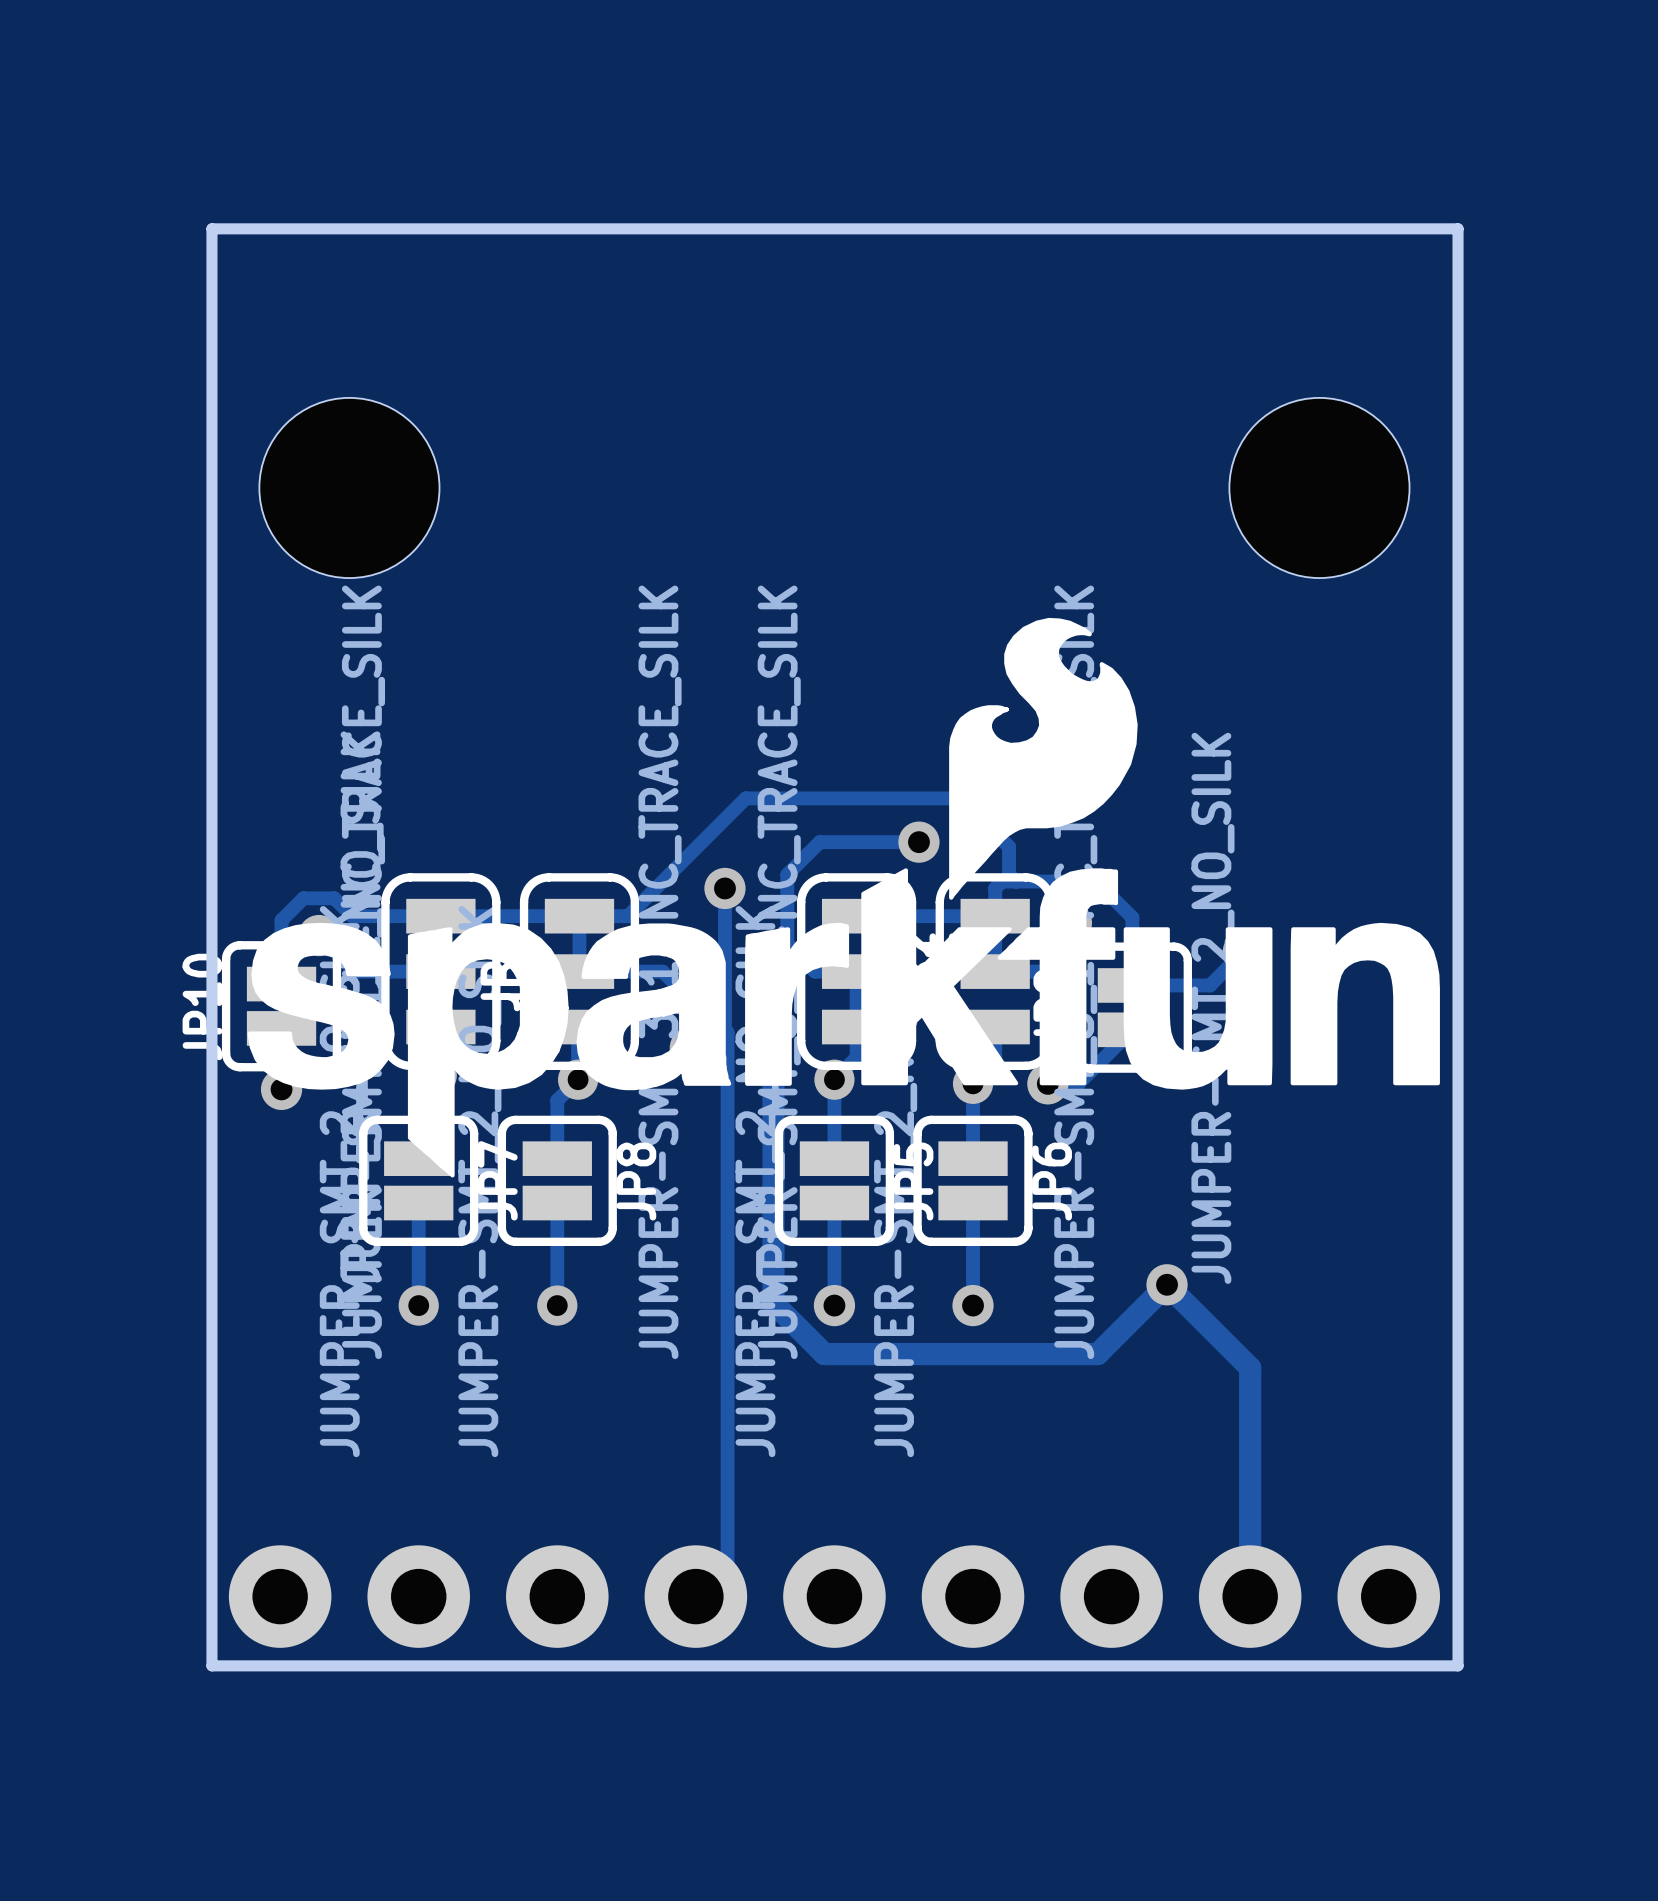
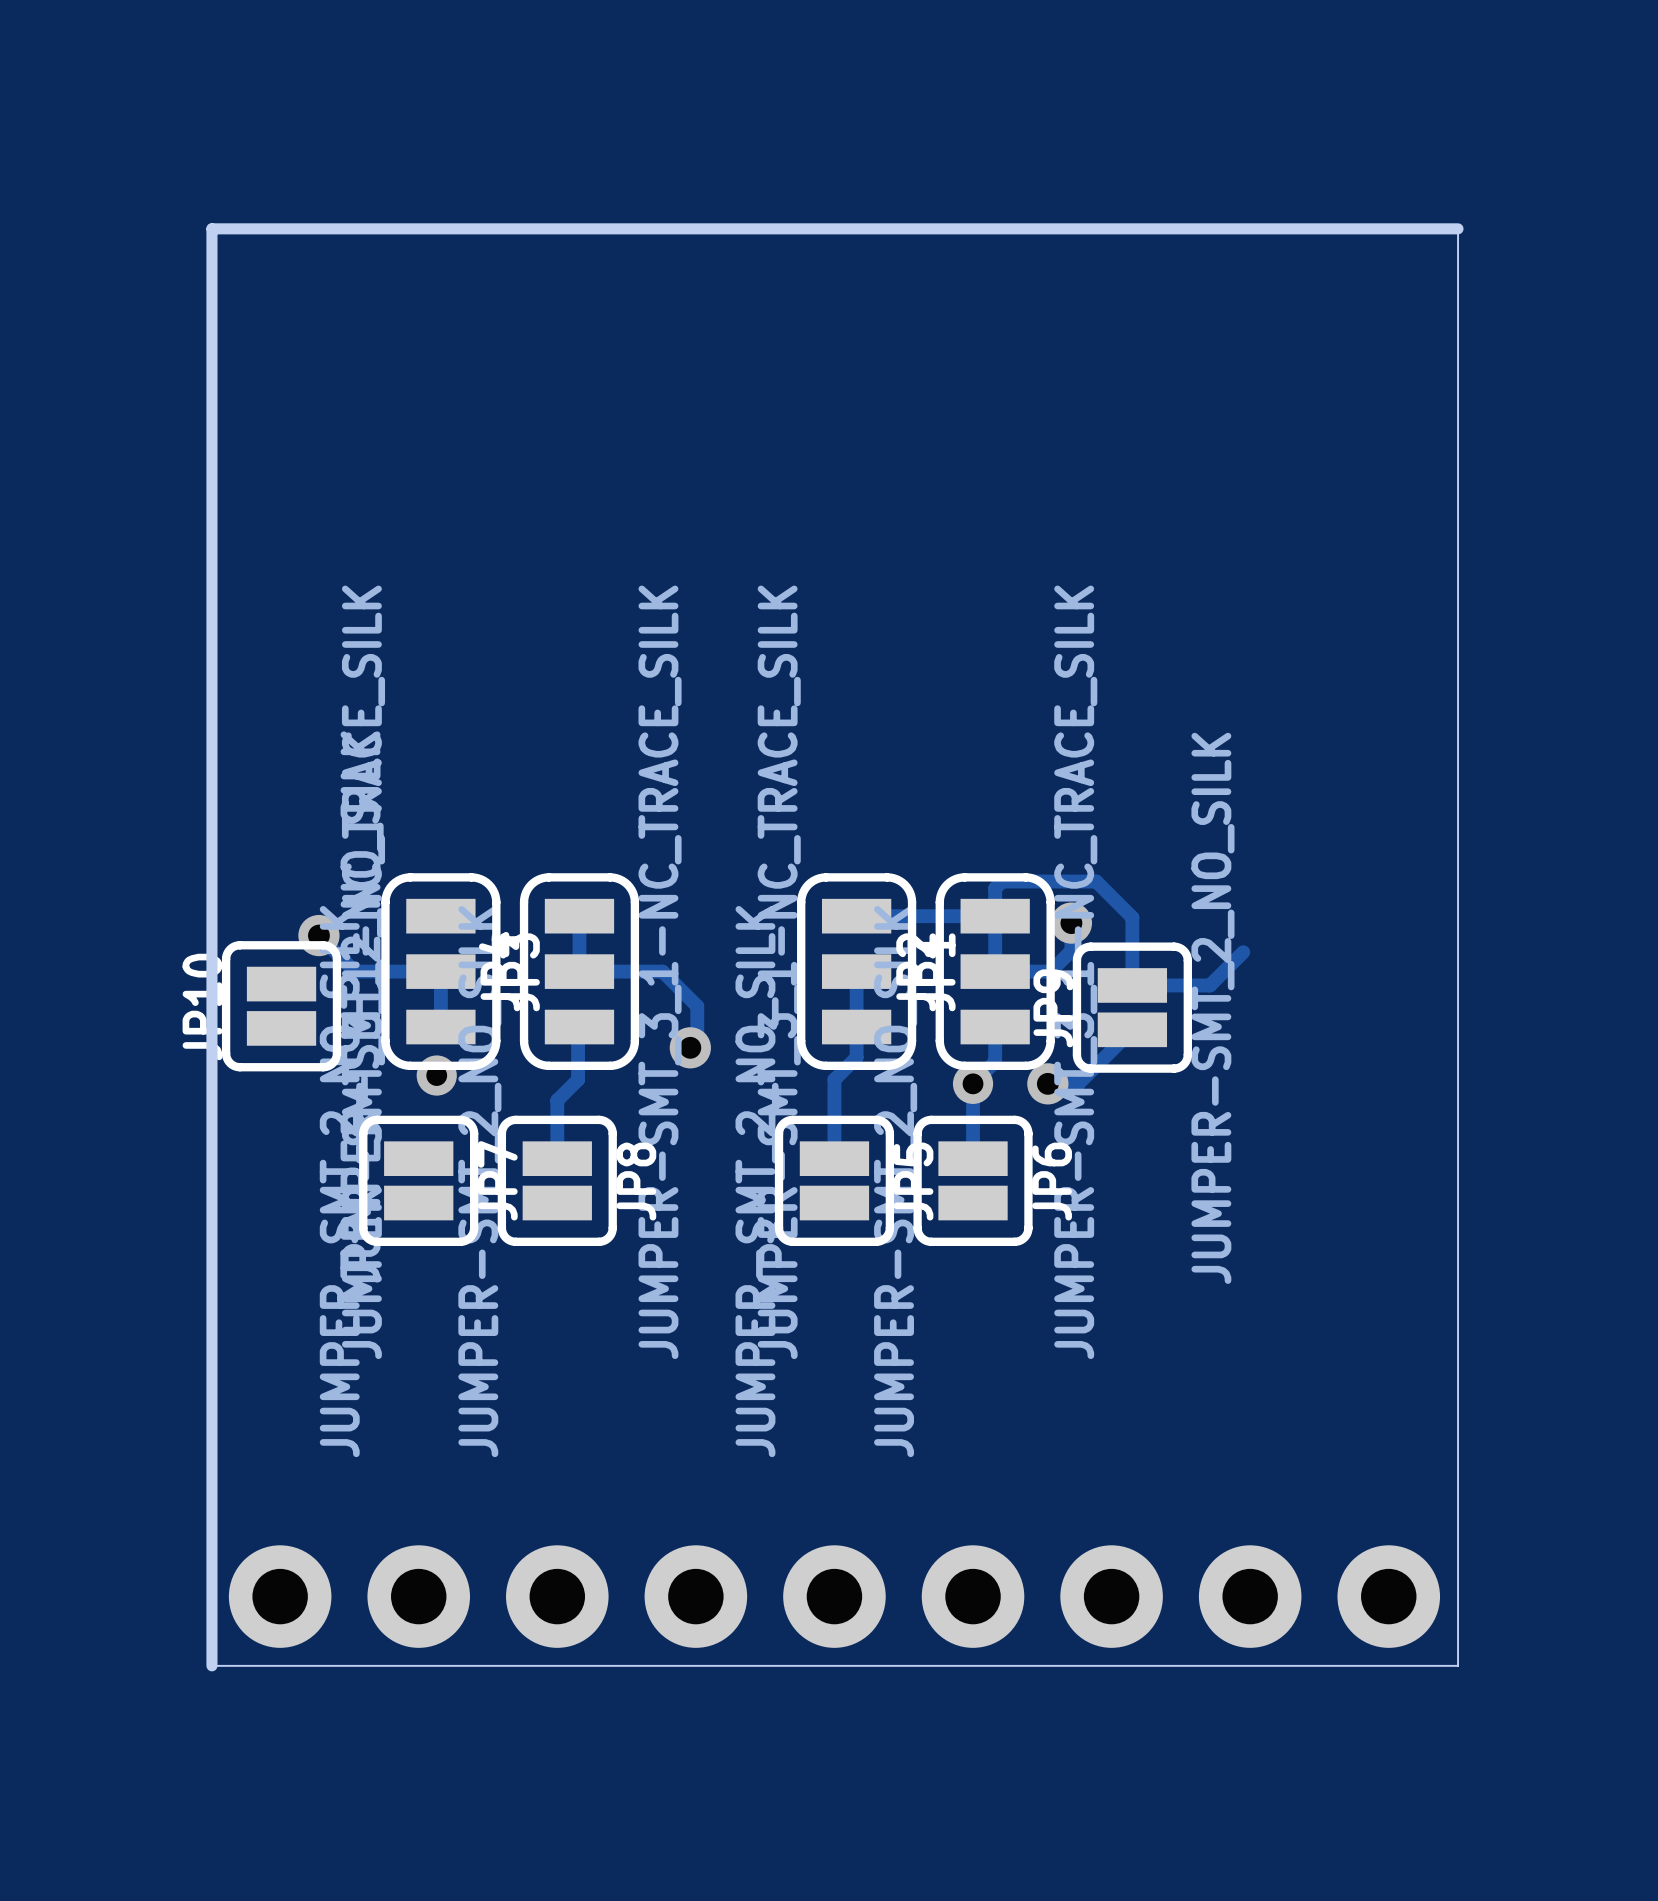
board edge width: thick (1458, 228) (1458, 1665) (211, 1665) -> thin (1458, 228) (1458, 1665) (211, 1665)
part: (349, 487) -> none
part: (1319, 487) -> none
drawing: [247, 617, 1440, 1178] -> none
track: (918, 842) (819, 842) (787, 874) (787, 943) (815, 971) (856, 971) -> none
via: (918, 842) -> none
track: (1015, 881) (1009, 874) (1009, 846) (960, 798) (745, 798) (627, 916) (352, 916) (334, 898) (303, 898) (281, 920) (281, 984) -> none
track: (724, 888) (724, 1029) (727, 1032) (727, 1564) (695, 1596) -> none
via: (724, 888) -> none
track: (773, 1027) (773, 1303) (824, 1354) (1097, 1354) (1167, 1284) (1250, 1367) (1250, 1596) -> none
via: (578, 1079) -> none
via: (834, 1079) -> none
via: (281, 1089) -> none
track: (418, 1203) (418, 1305) -> none
track: (557, 1203) (557, 1305) -> none
track: (834, 1203) (834, 1305) -> none
track: (973, 1203) (973, 1305) -> none
via: (1167, 1284) -> none
via: (418, 1305) -> none
via: (557, 1305) -> none
via: (834, 1305) -> none
via: (973, 1305) -> none

